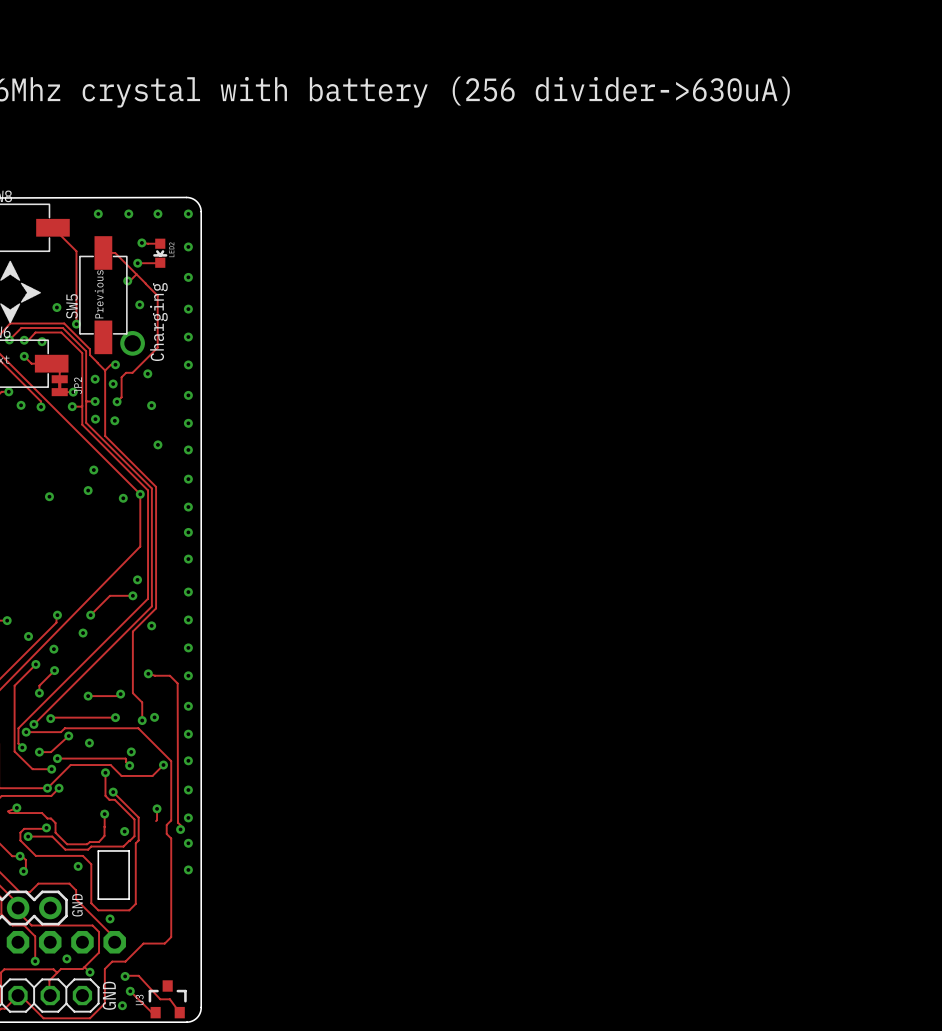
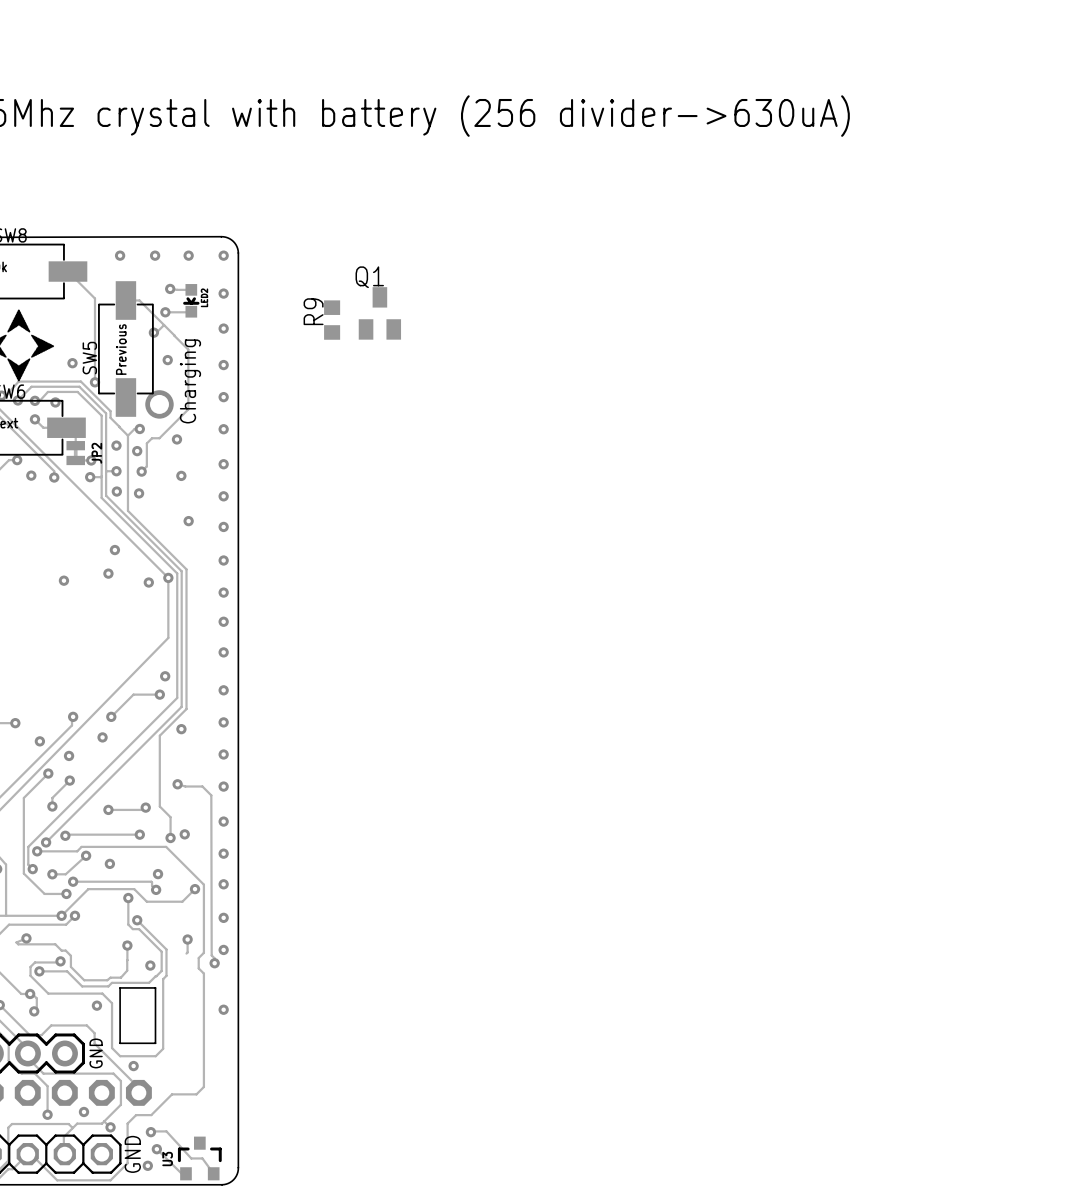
Q1: none -> (379, 313)
R9: none -> (332, 320)
via: (188, 843) -> none

